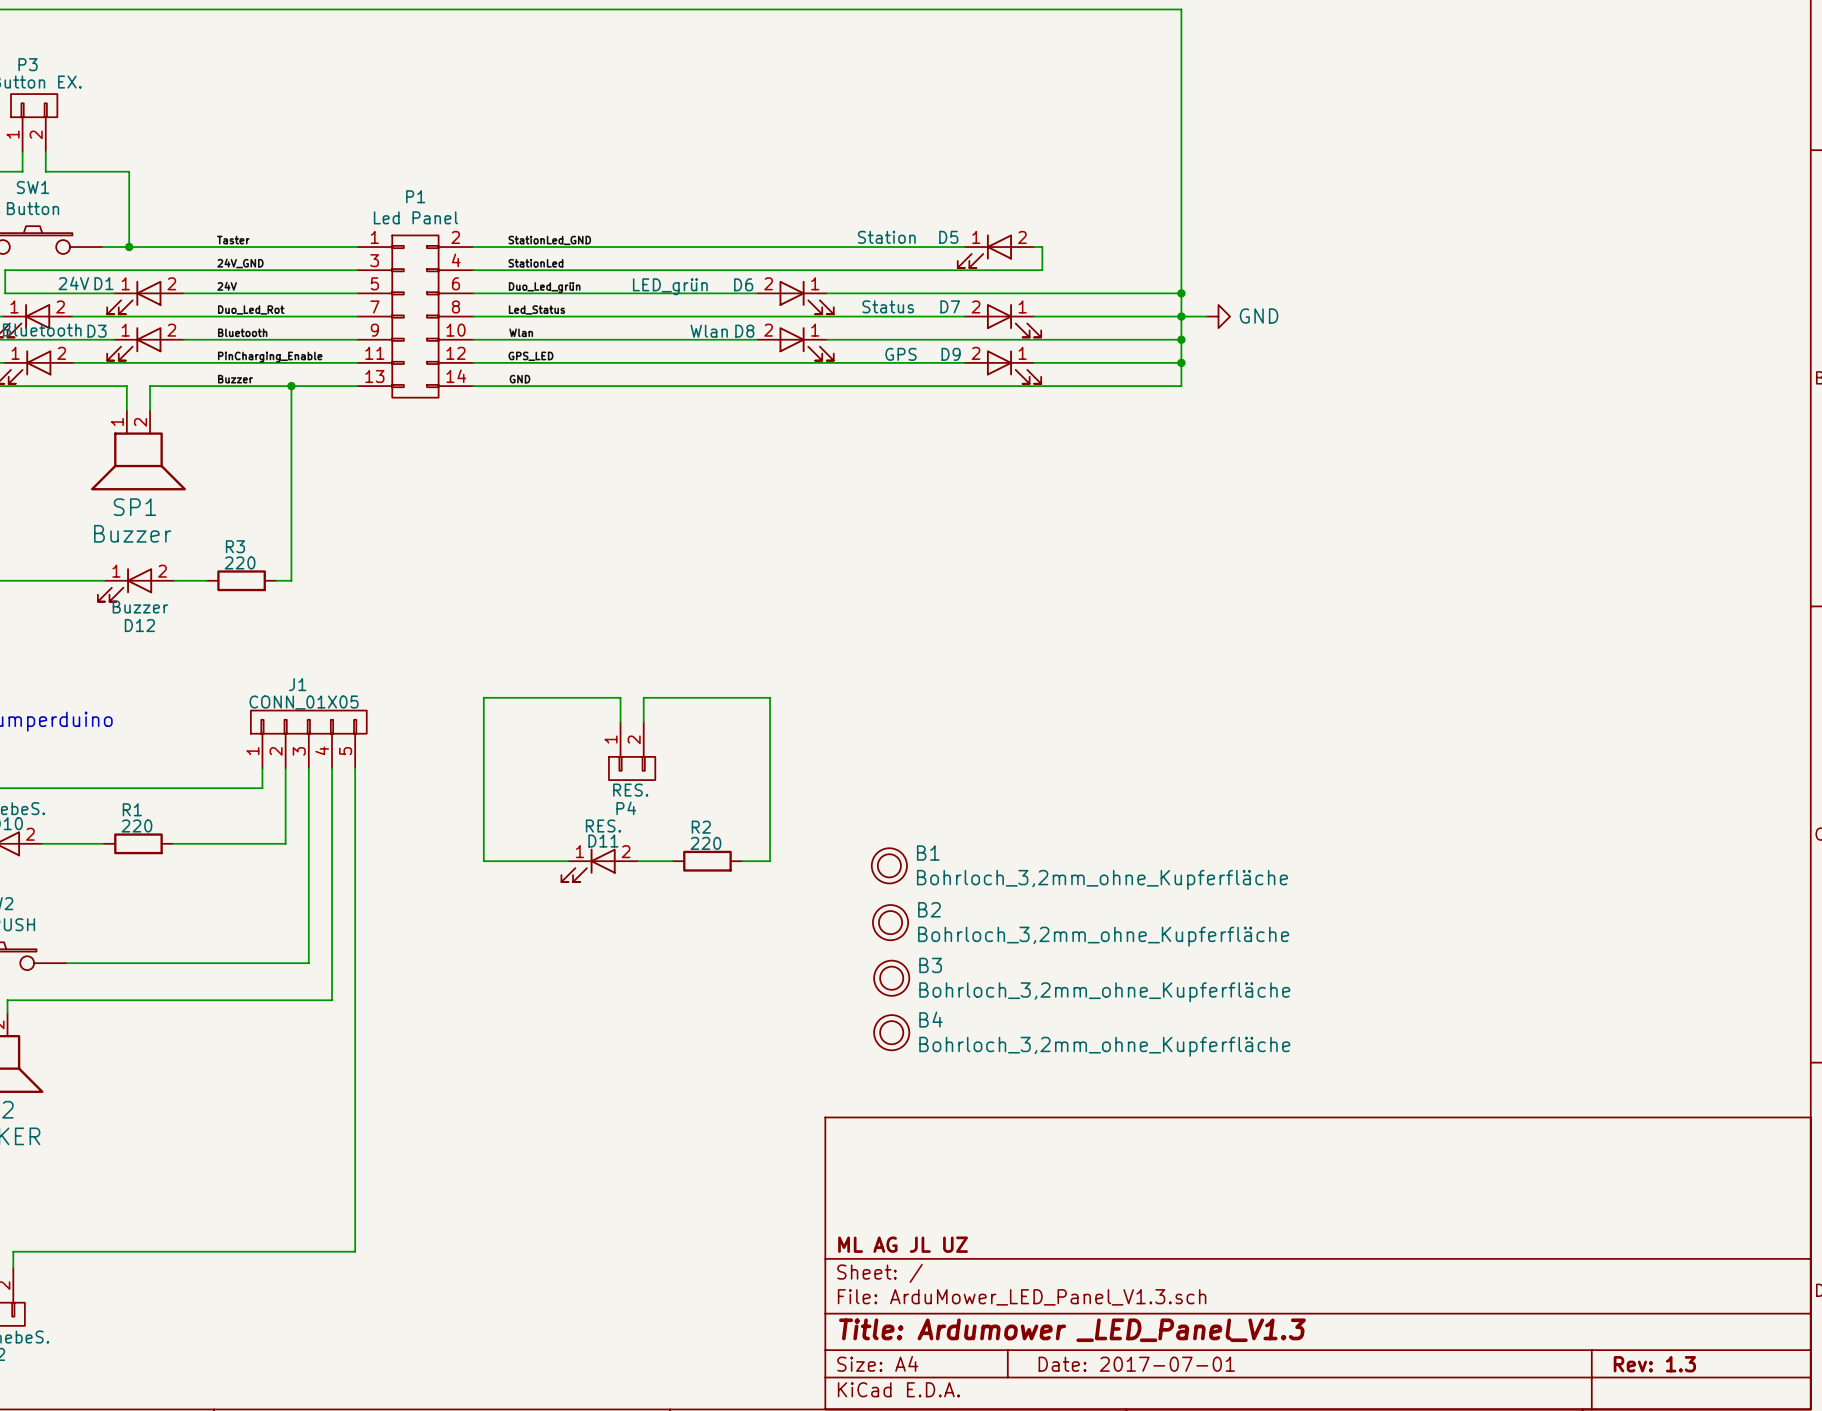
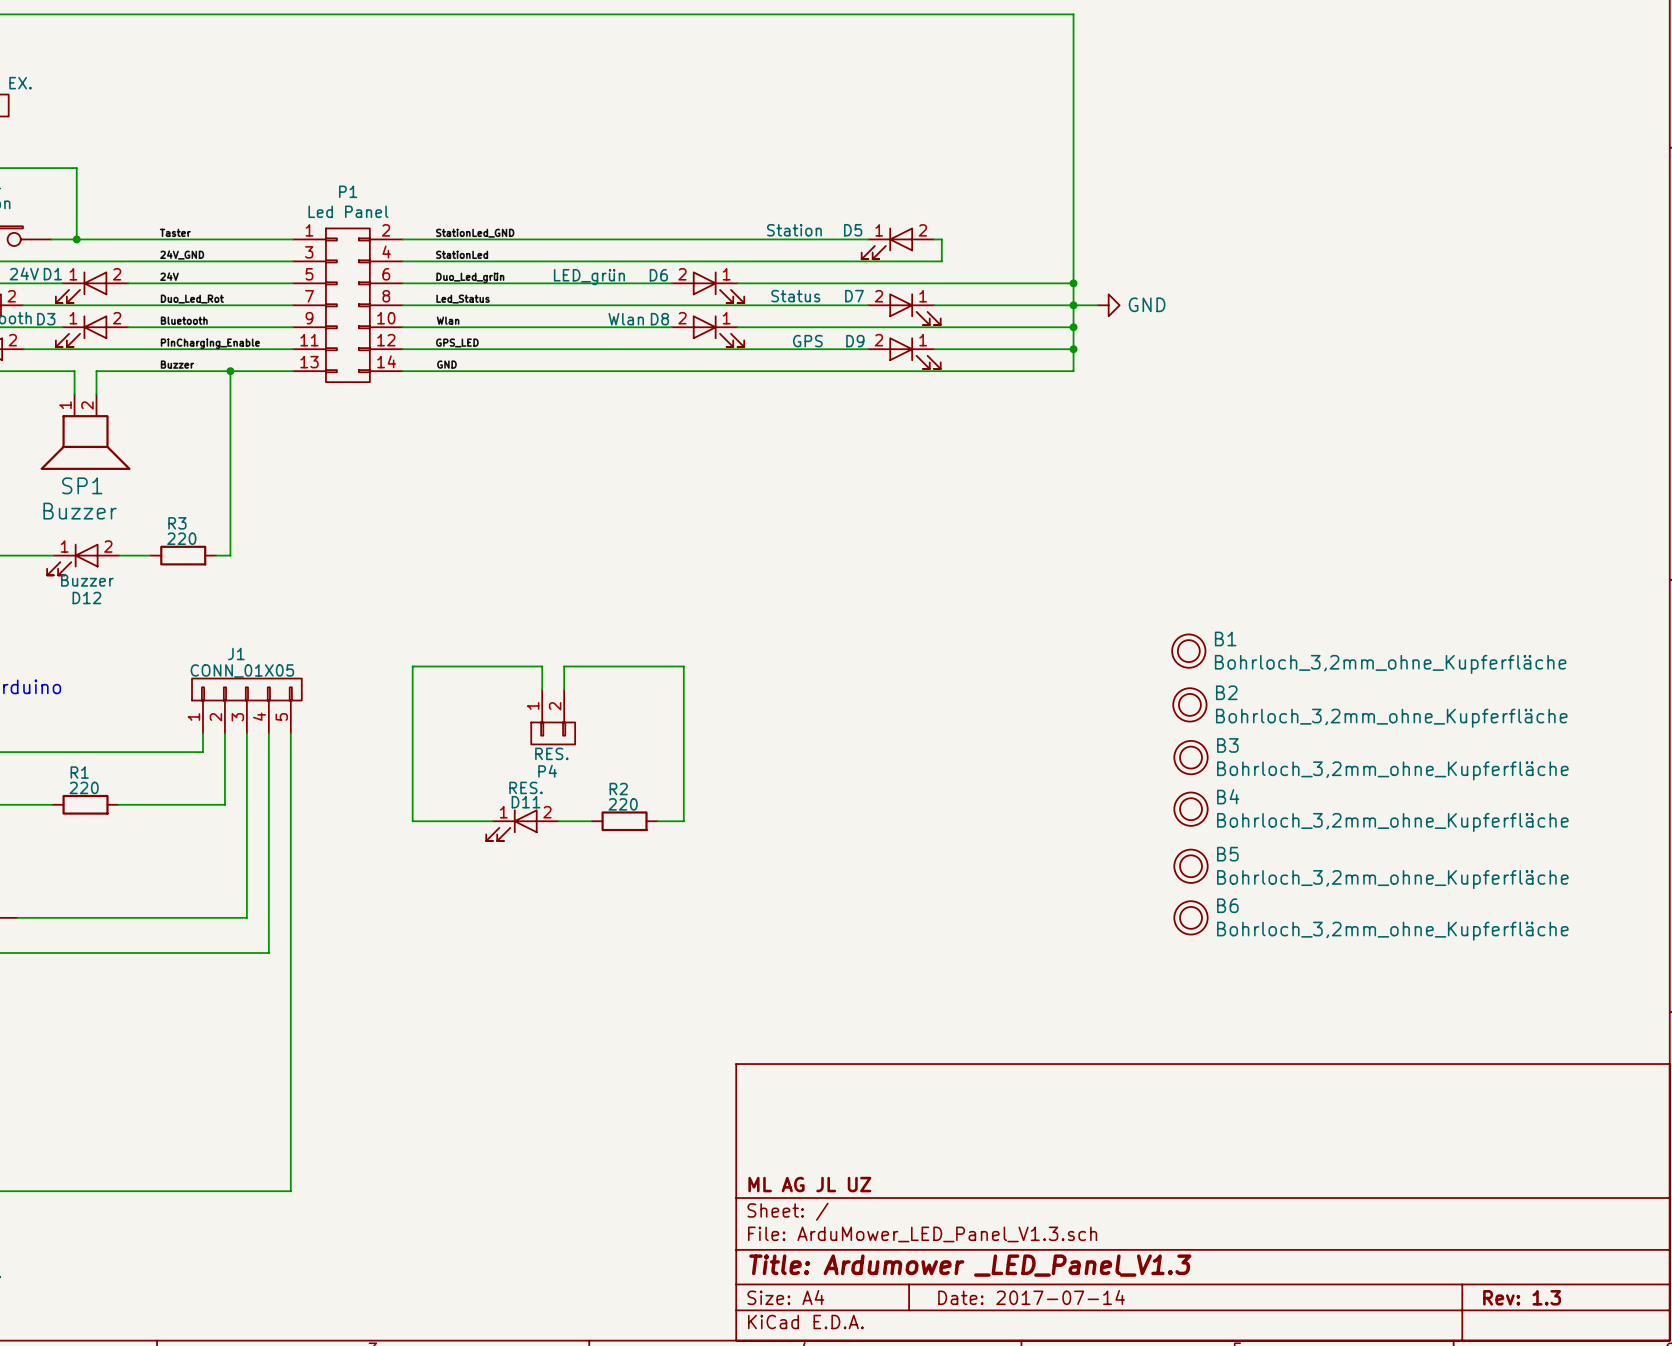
B1 position: (889, 865) -> (1188, 651)
B5: none -> Bohrloch_3,2mm_ohne_Kupferfläche (1191, 866)
B2 position: (890, 922) -> (1189, 704)
B6: none -> Bohrloch_3,2mm_ohne_Kupferfläche (1191, 917)
B3 position: (891, 978) -> (1191, 757)
B4 position: (891, 1032) -> (1191, 809)
title block: Date: 2017-07-01 (1136, 1364) -> Date: 2017-07-14 (1031, 1297)

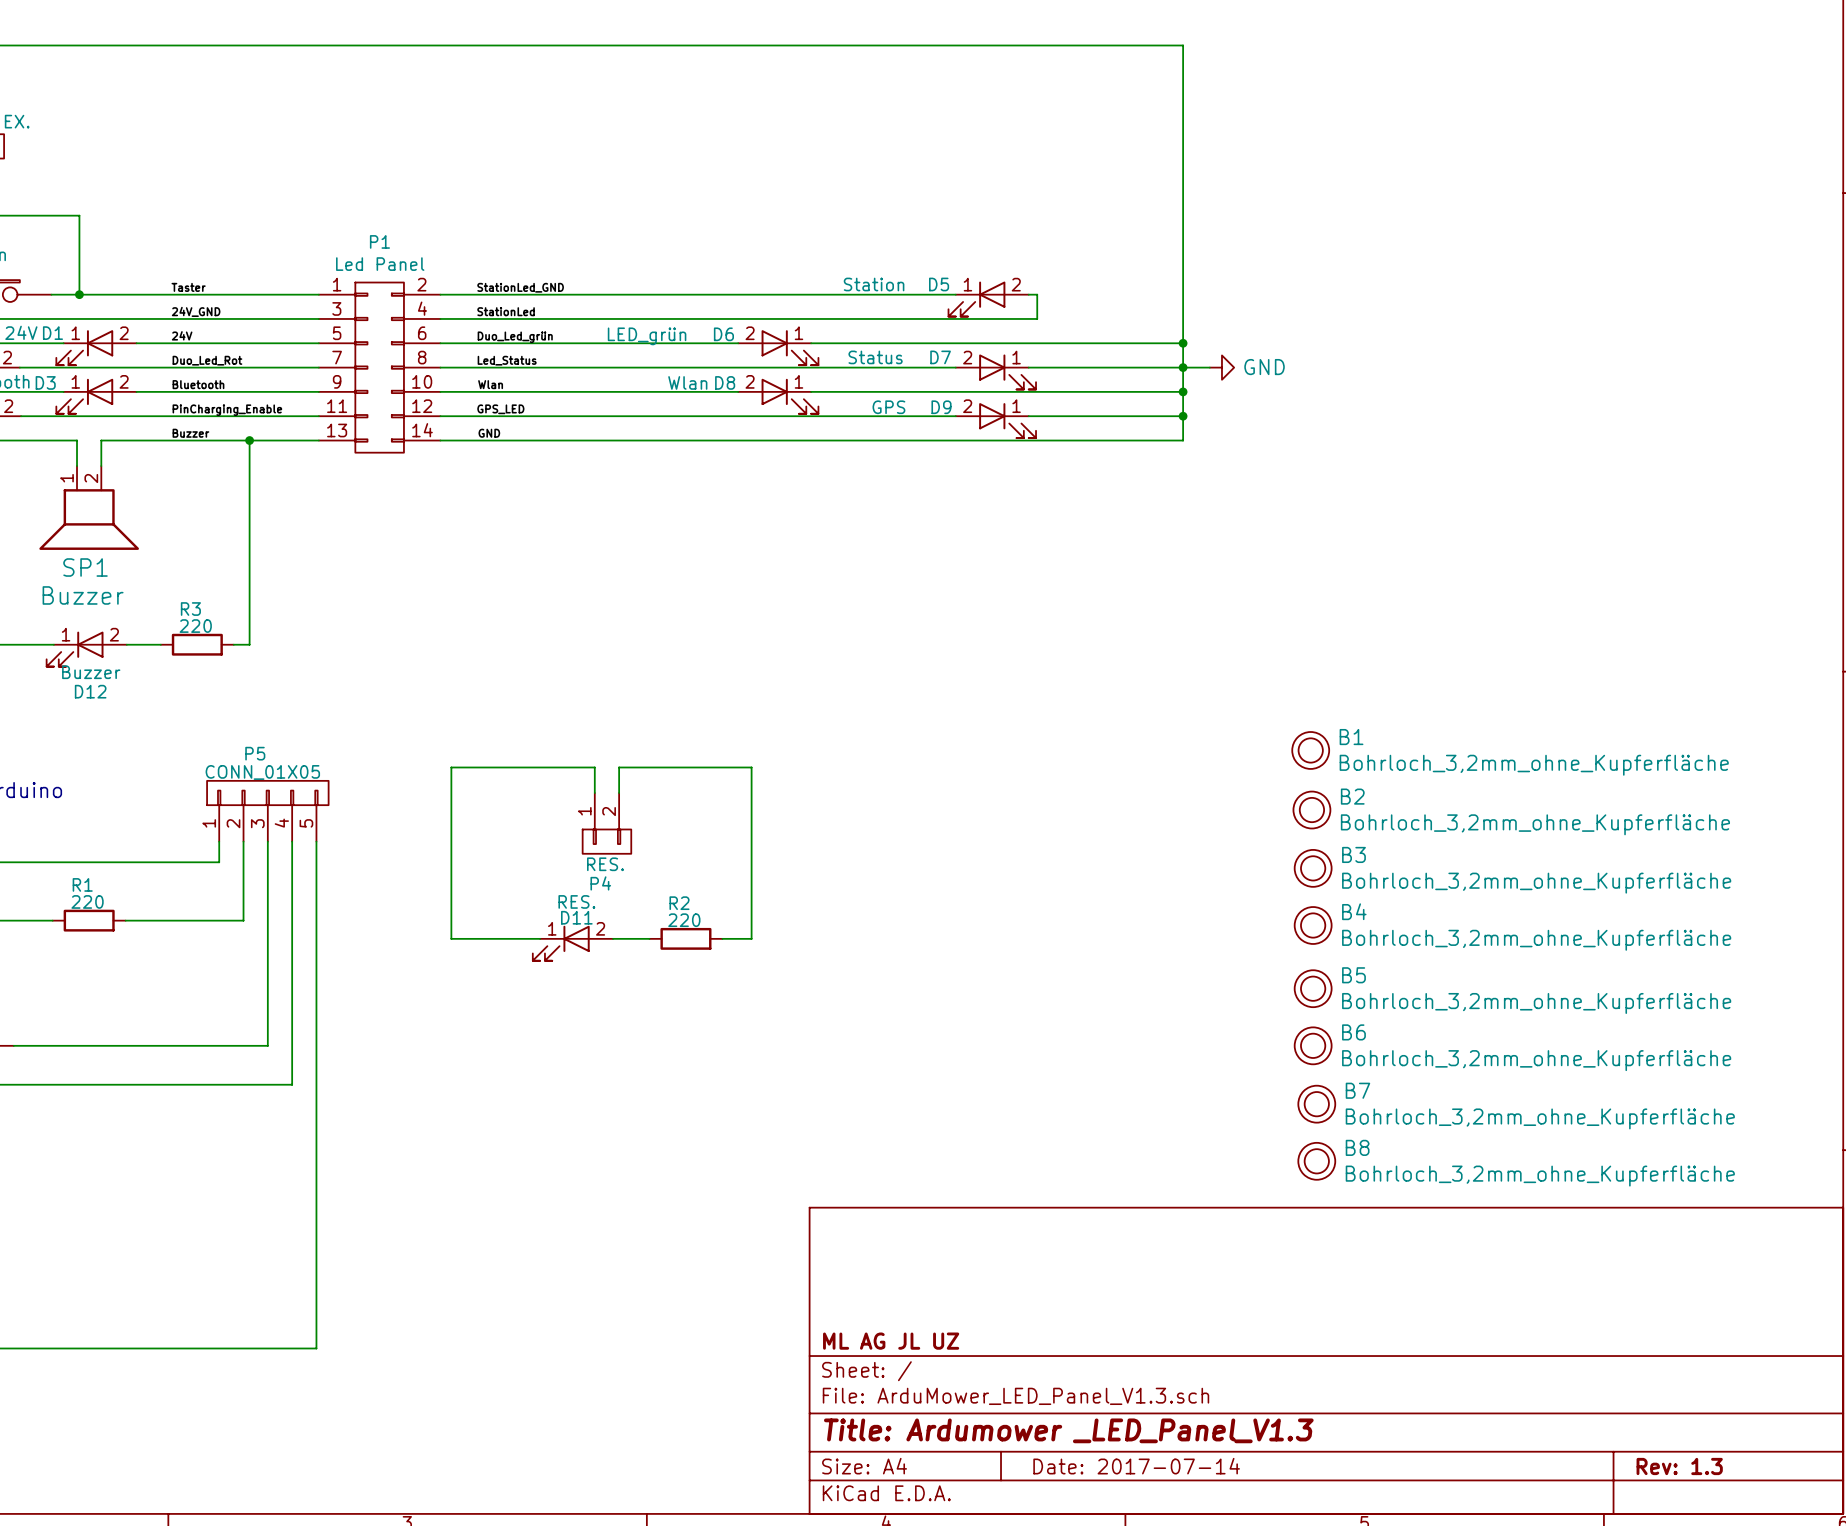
J1 name: J1 (236, 653) -> P5 (255, 753)
B7: none -> Bohrloch_3,2mm_ohne_Kupferfläche (1316, 1104)
B8: none -> Bohrloch_3,2mm_ohne_Kupferfläche (1316, 1161)

